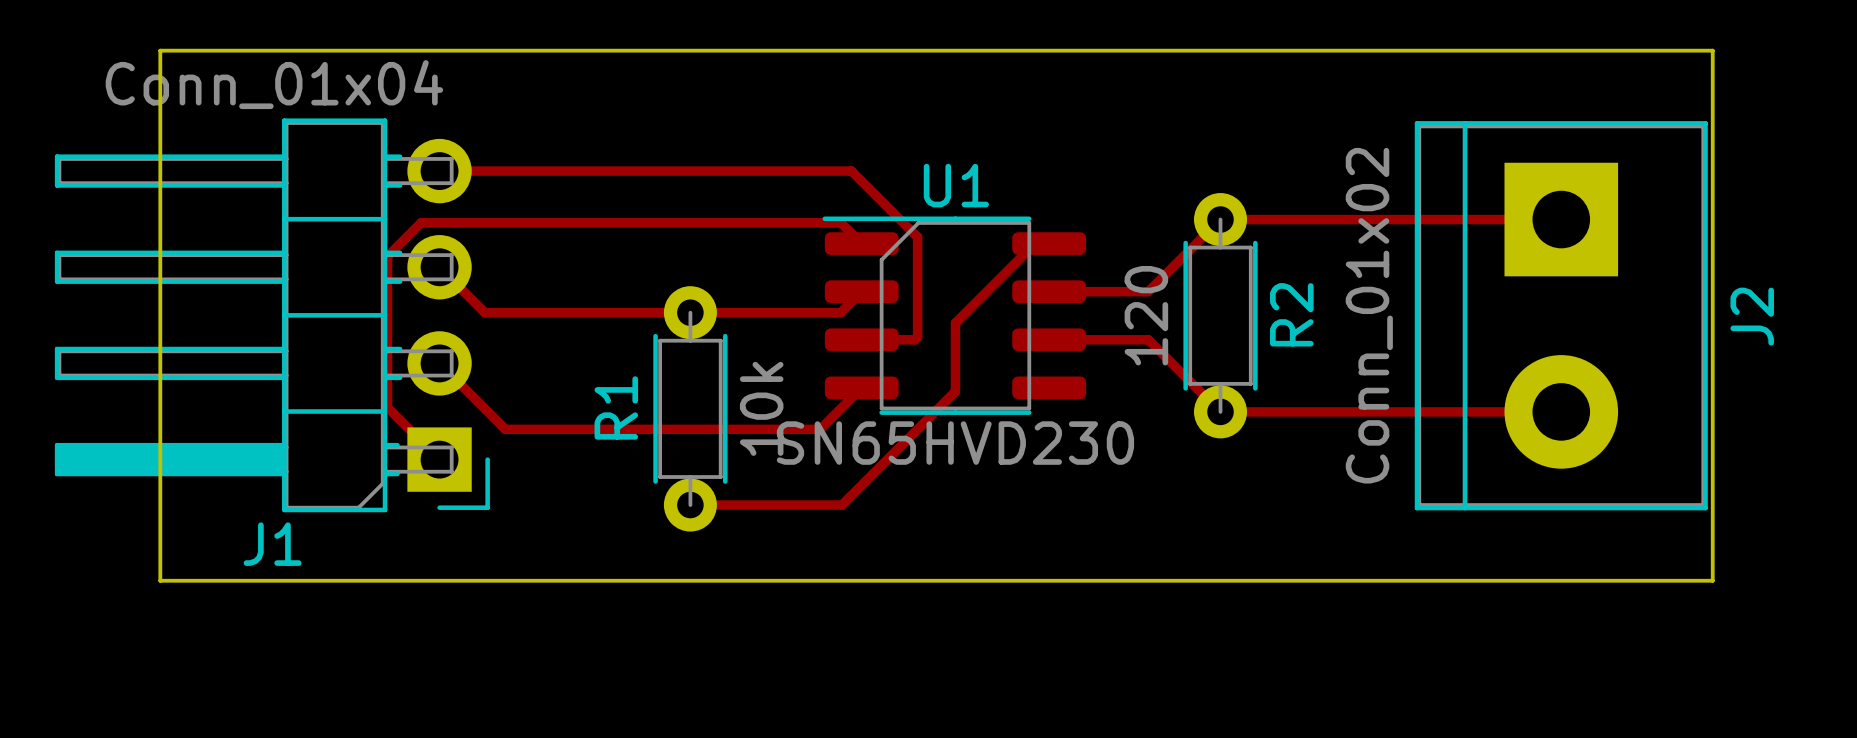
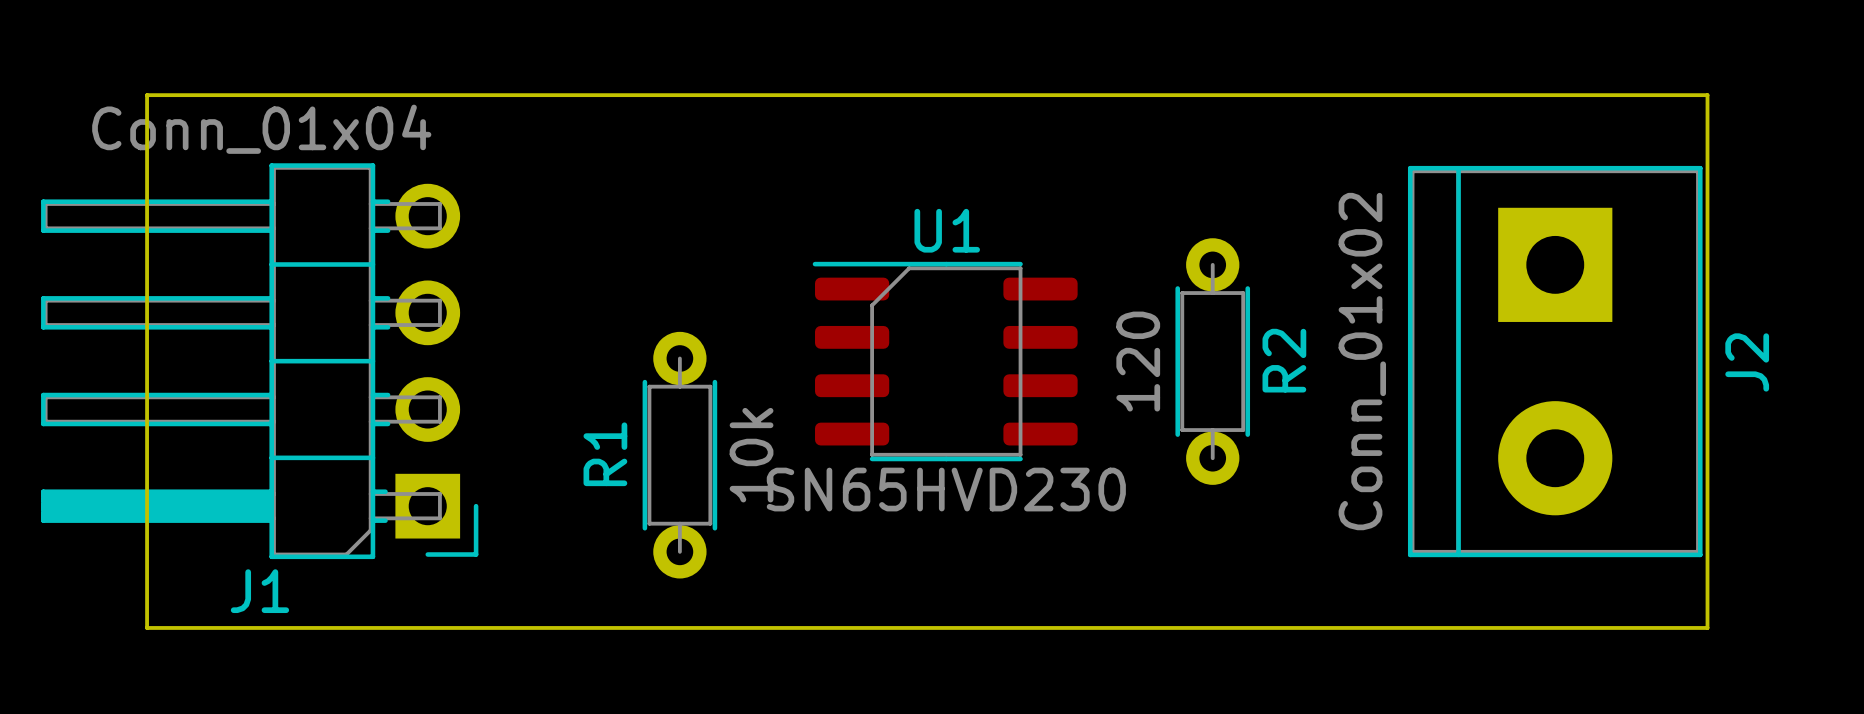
track: (439, 171) (851, 171) (917, 237) (917, 336) (914, 339) (861, 339) -> none
track: (1561, 219) (1220, 219) (1148, 291) (1049, 291) -> none
track: (861, 243) (840, 222) (421, 222) (387, 256) (387, 407) (439, 459) -> none
track: (1049, 243) (1034, 243) (955, 323) (955, 391) (841, 505) (690, 505) -> none
track: (439, 267) (484, 312) (840, 312) (861, 291) -> none
track: (1049, 339) (1148, 339) (1220, 411) (1561, 411) -> none
track: (439, 363) (505, 429) (820, 429) (861, 387) -> none

